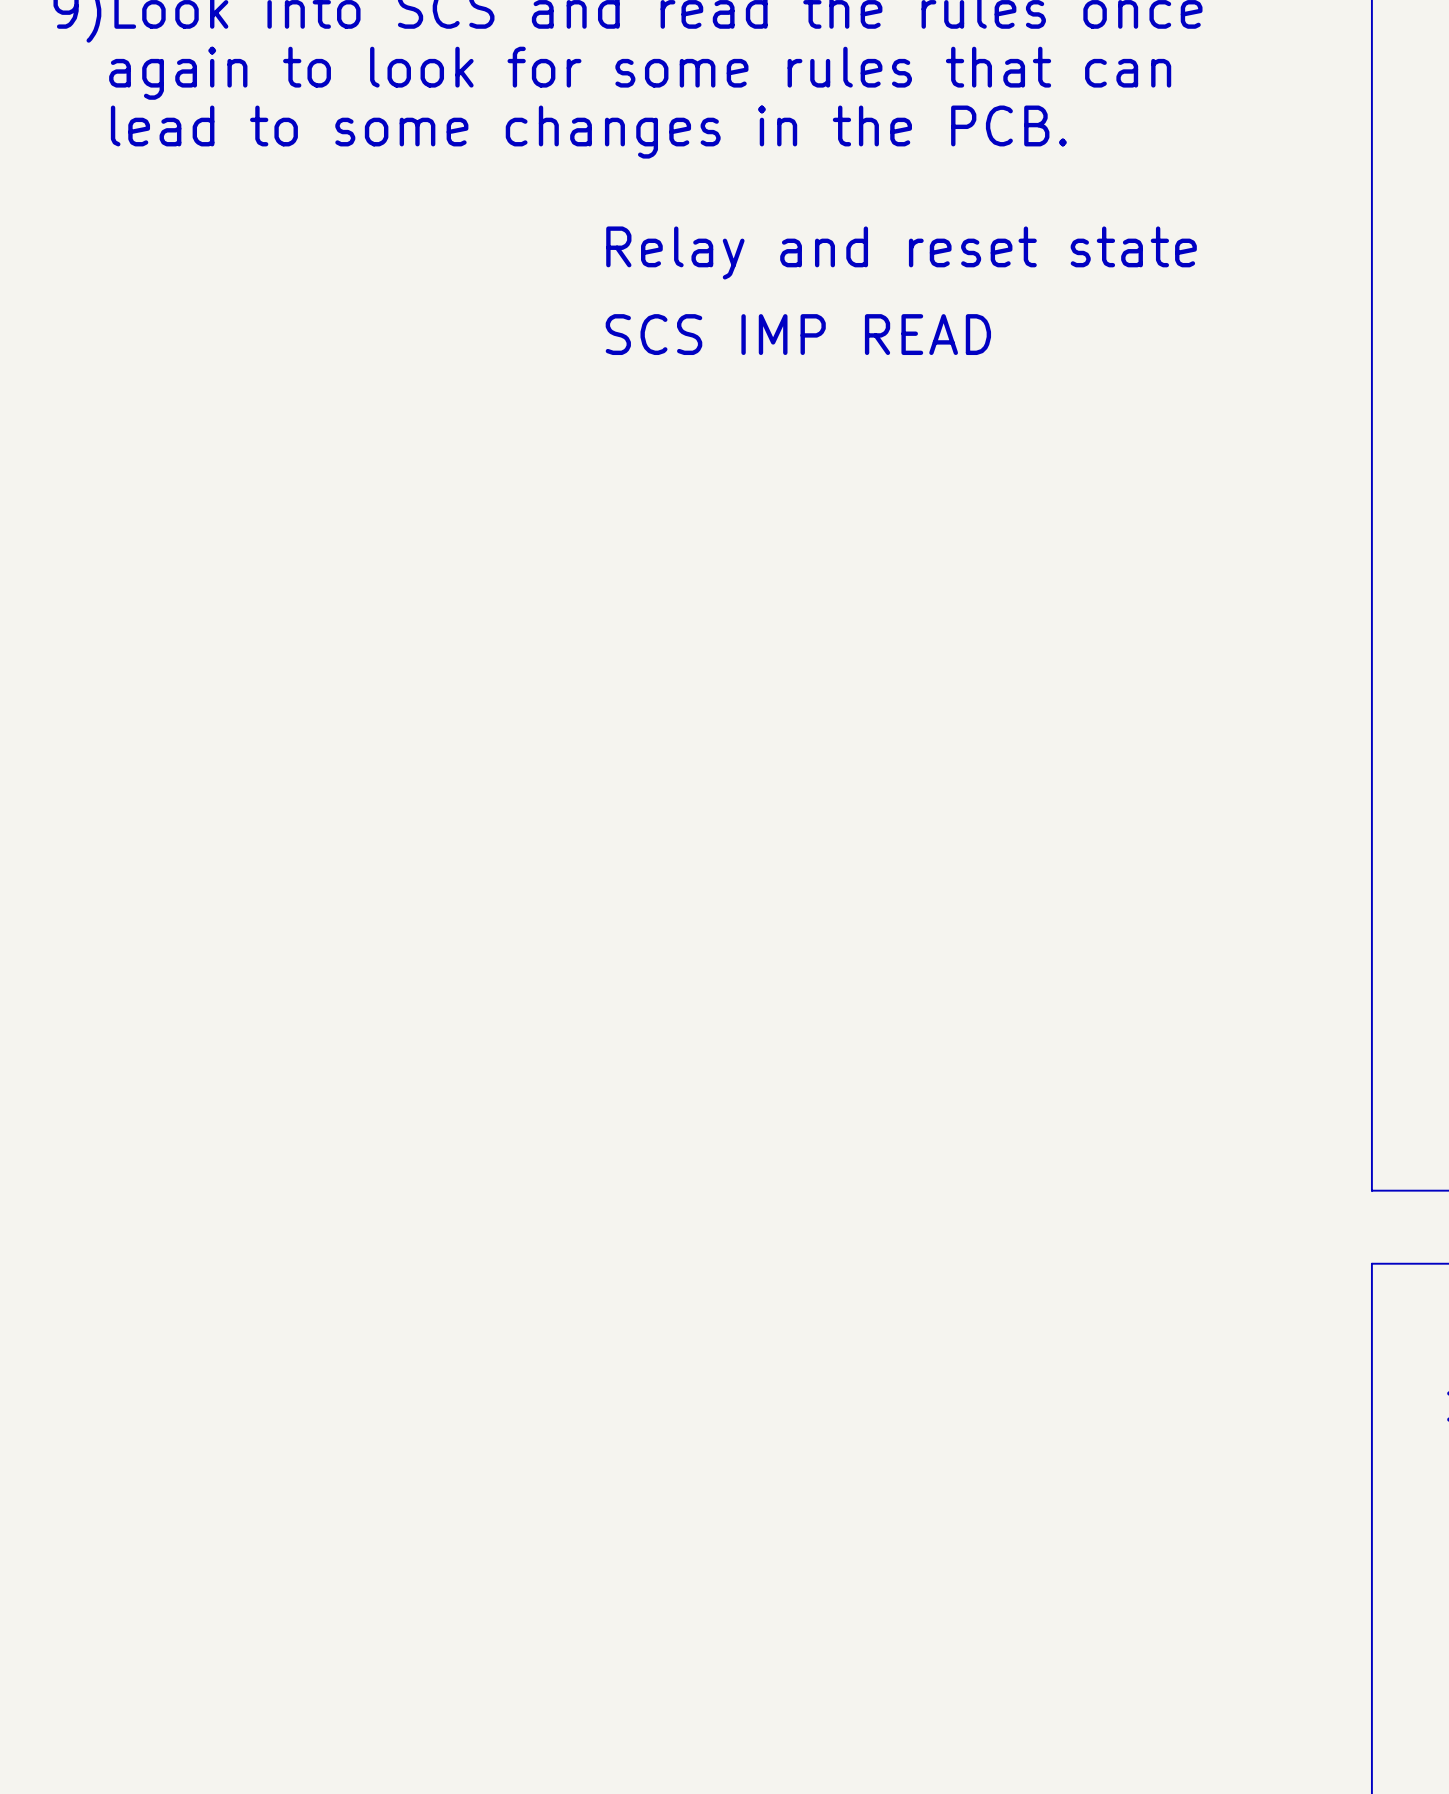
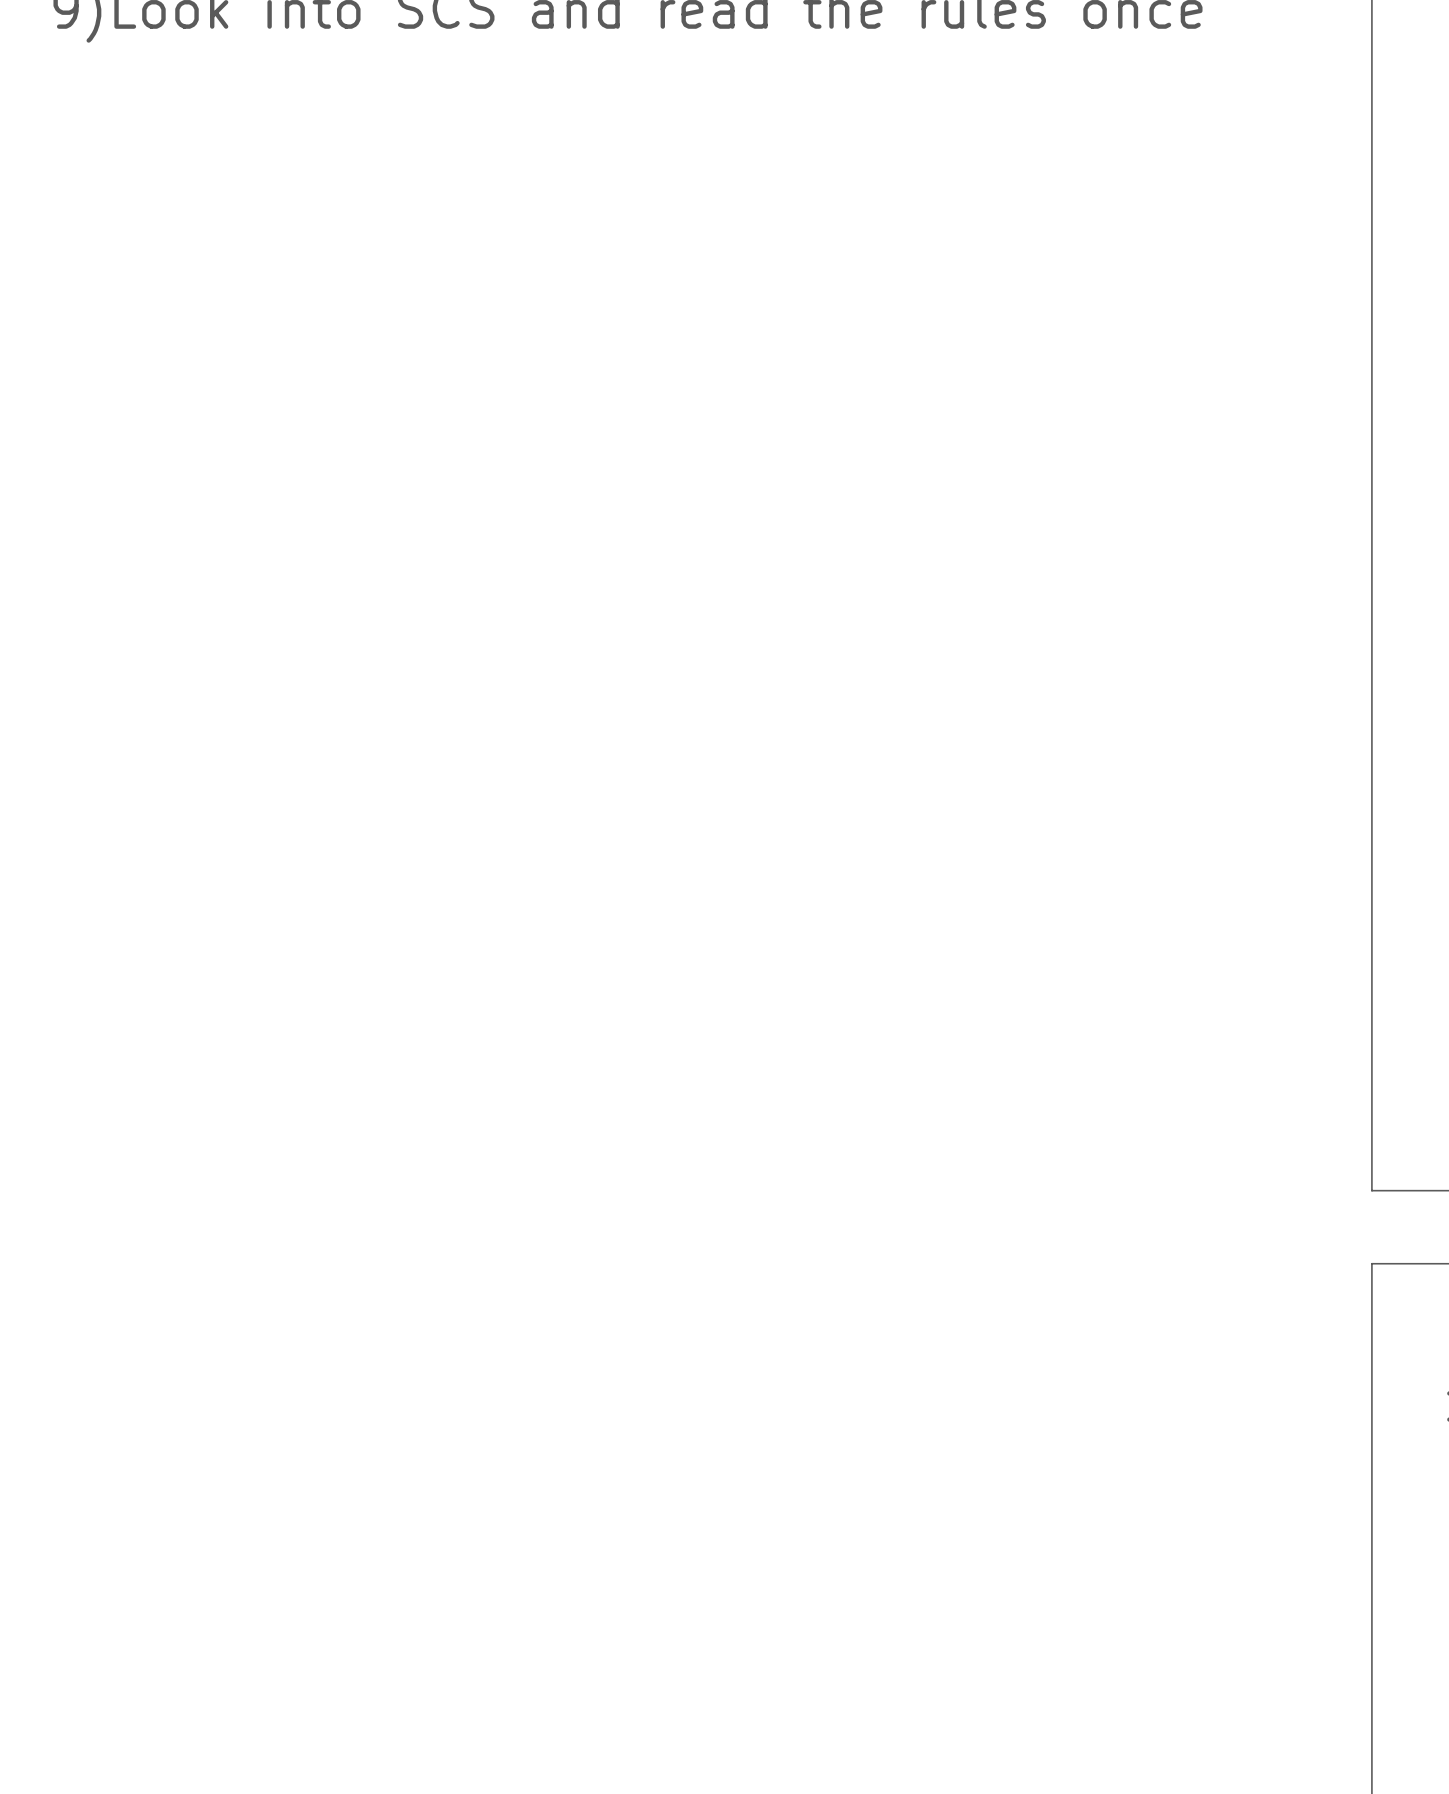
text: again to look for some rules that can (640, 73) -> none
text: lead to some changes in the PCB. (588, 132) -> none
text: Relay and reset state (901, 252) -> none
text: SCS IMP READ (798, 334) -> none

